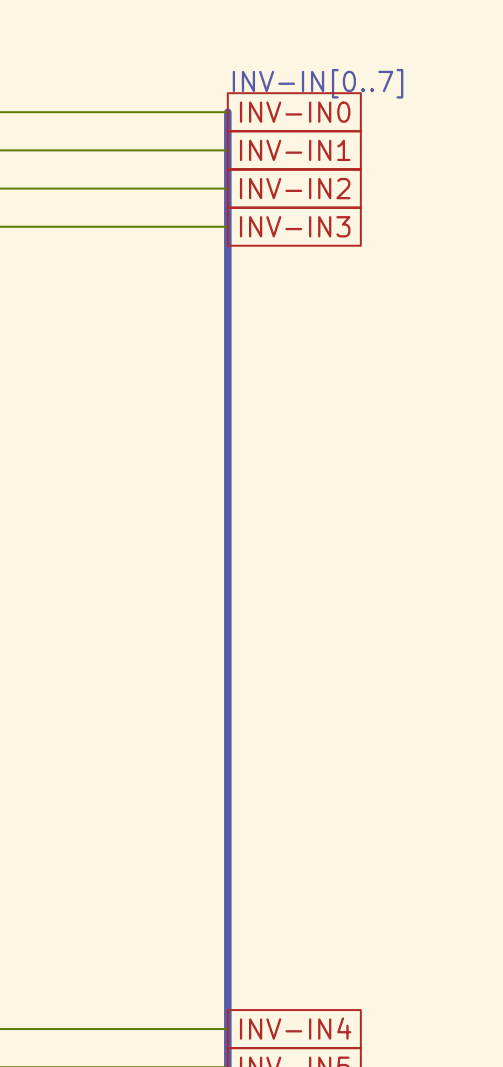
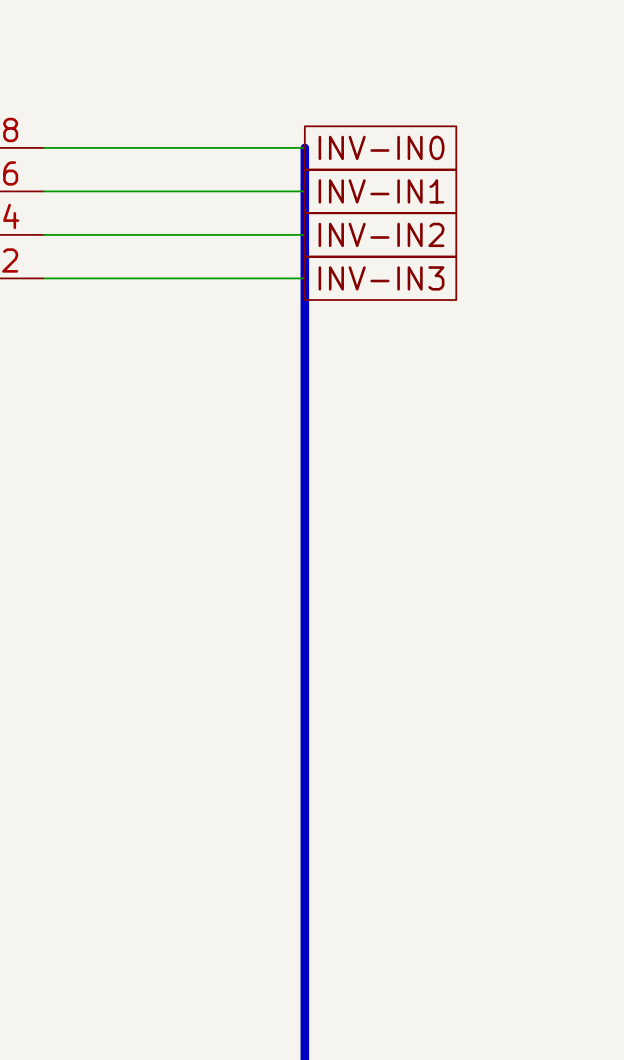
text: INV-IN[0..7] (318, 83) -> none

